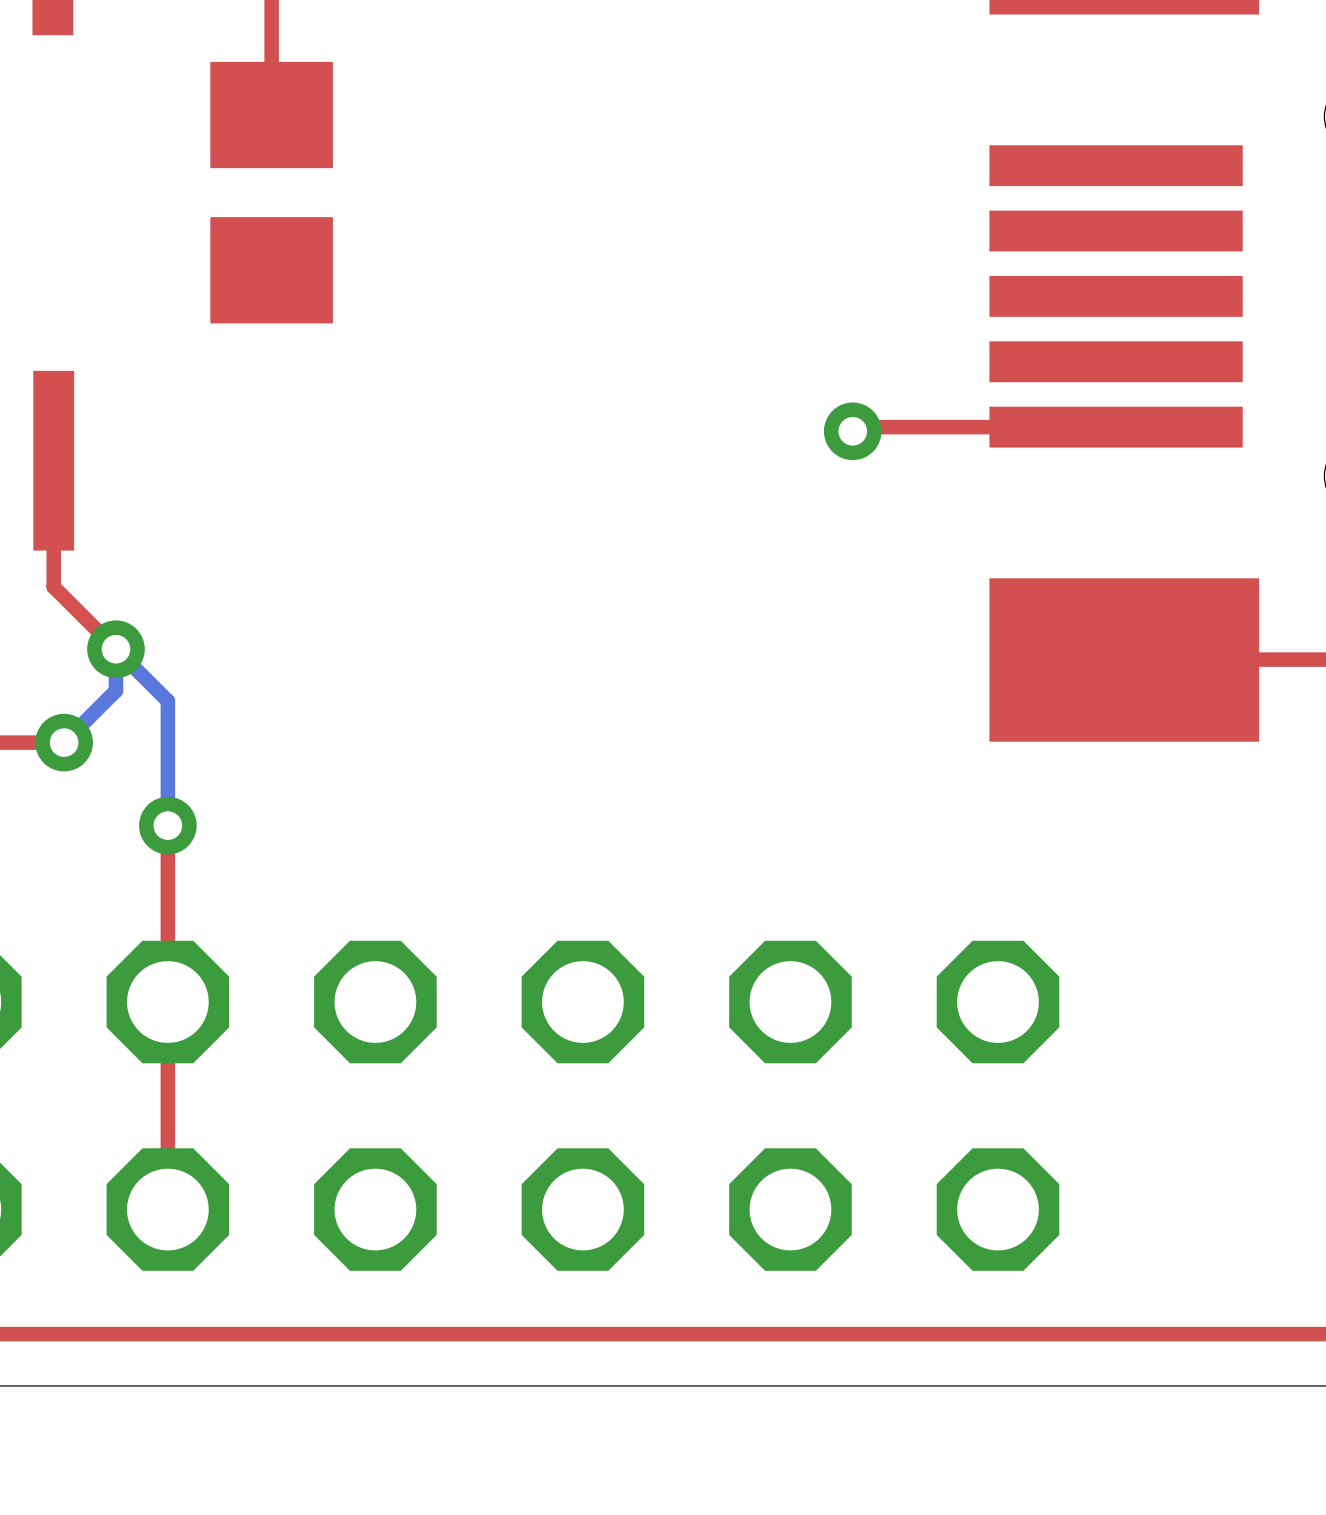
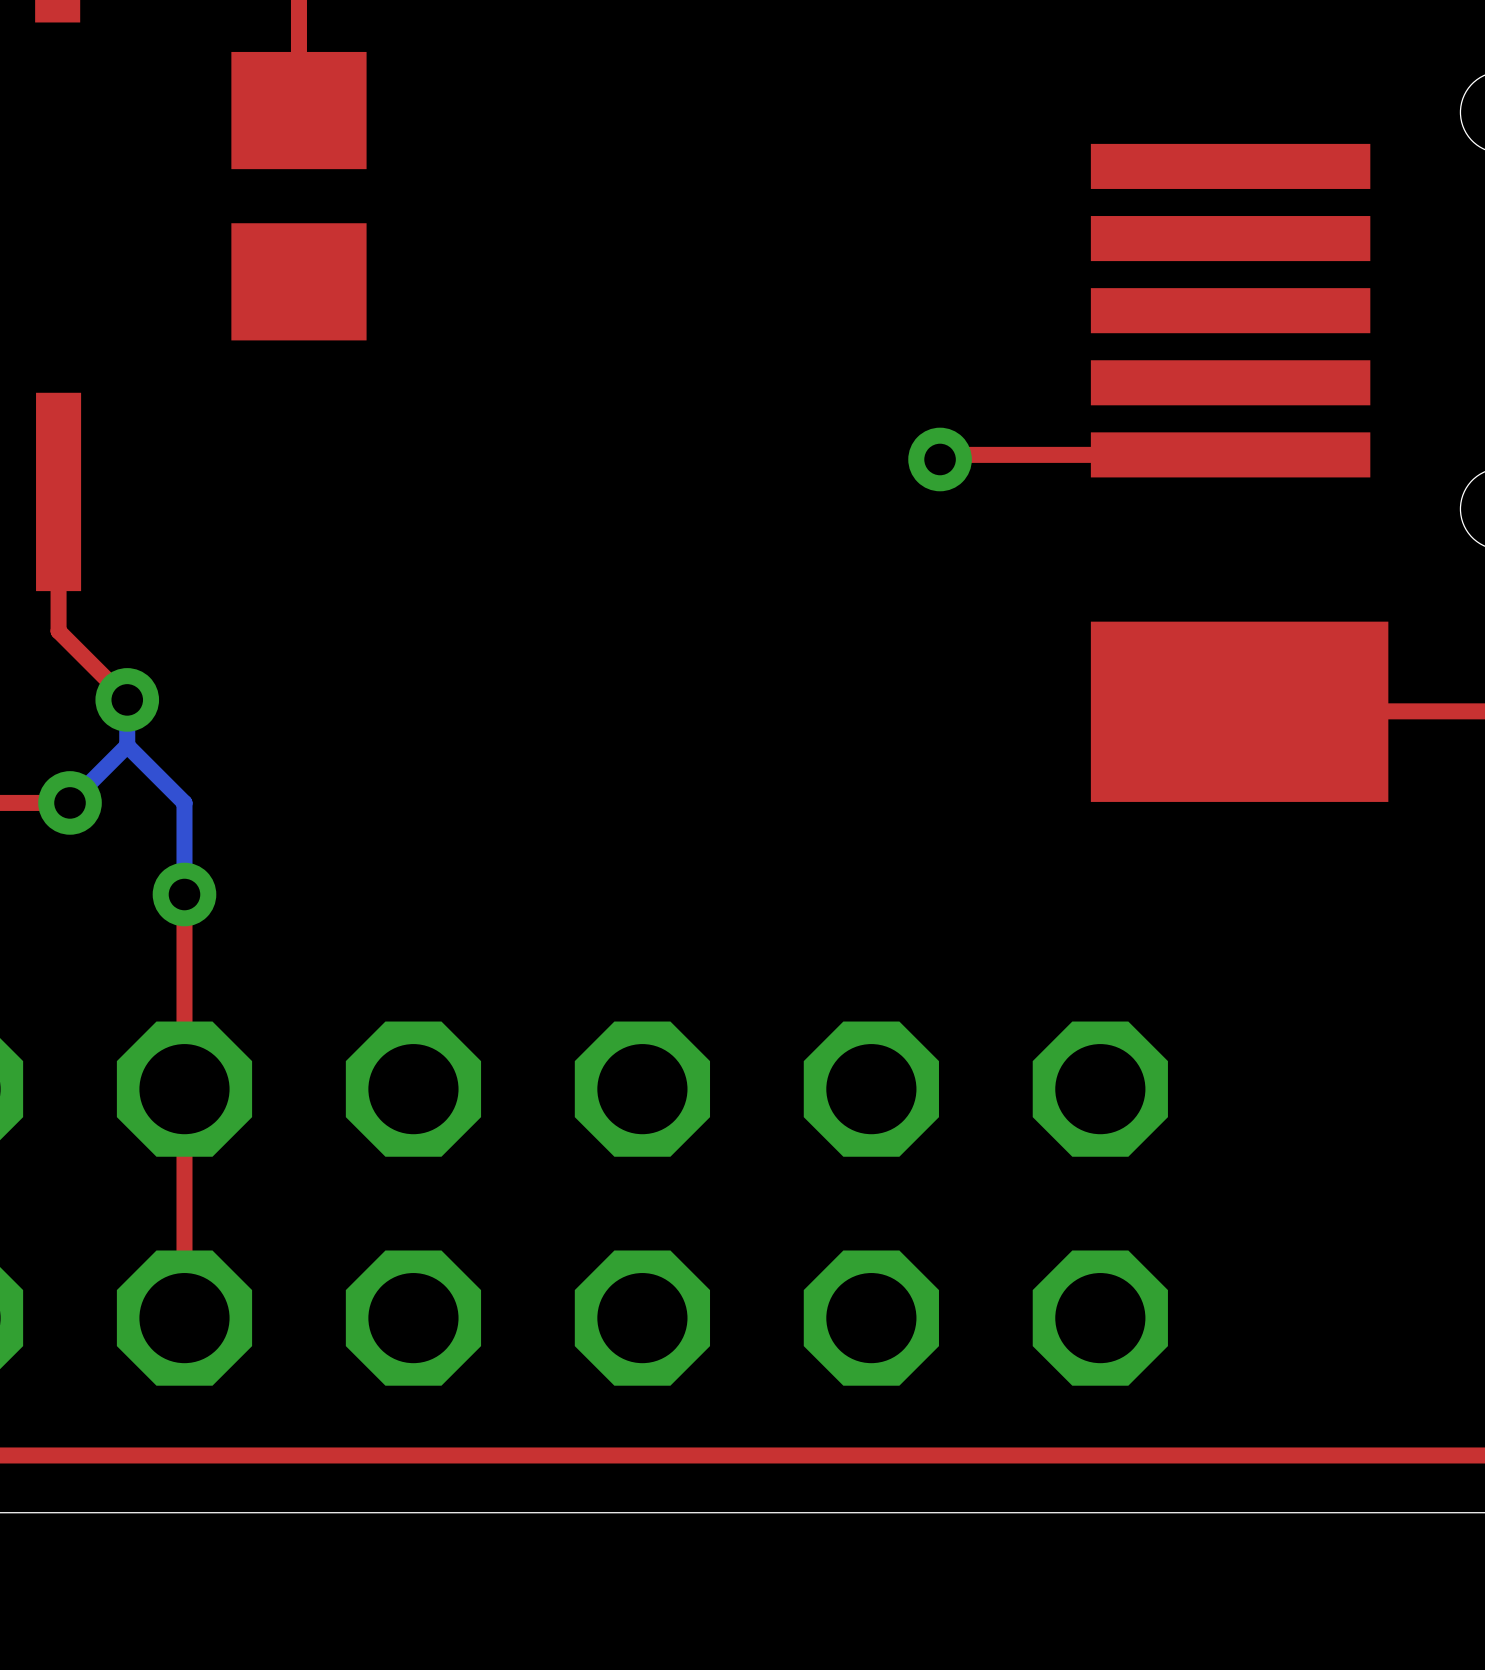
bottom track: (115, 649) (167, 701) (167, 742) -> (127, 745) (184, 802)

